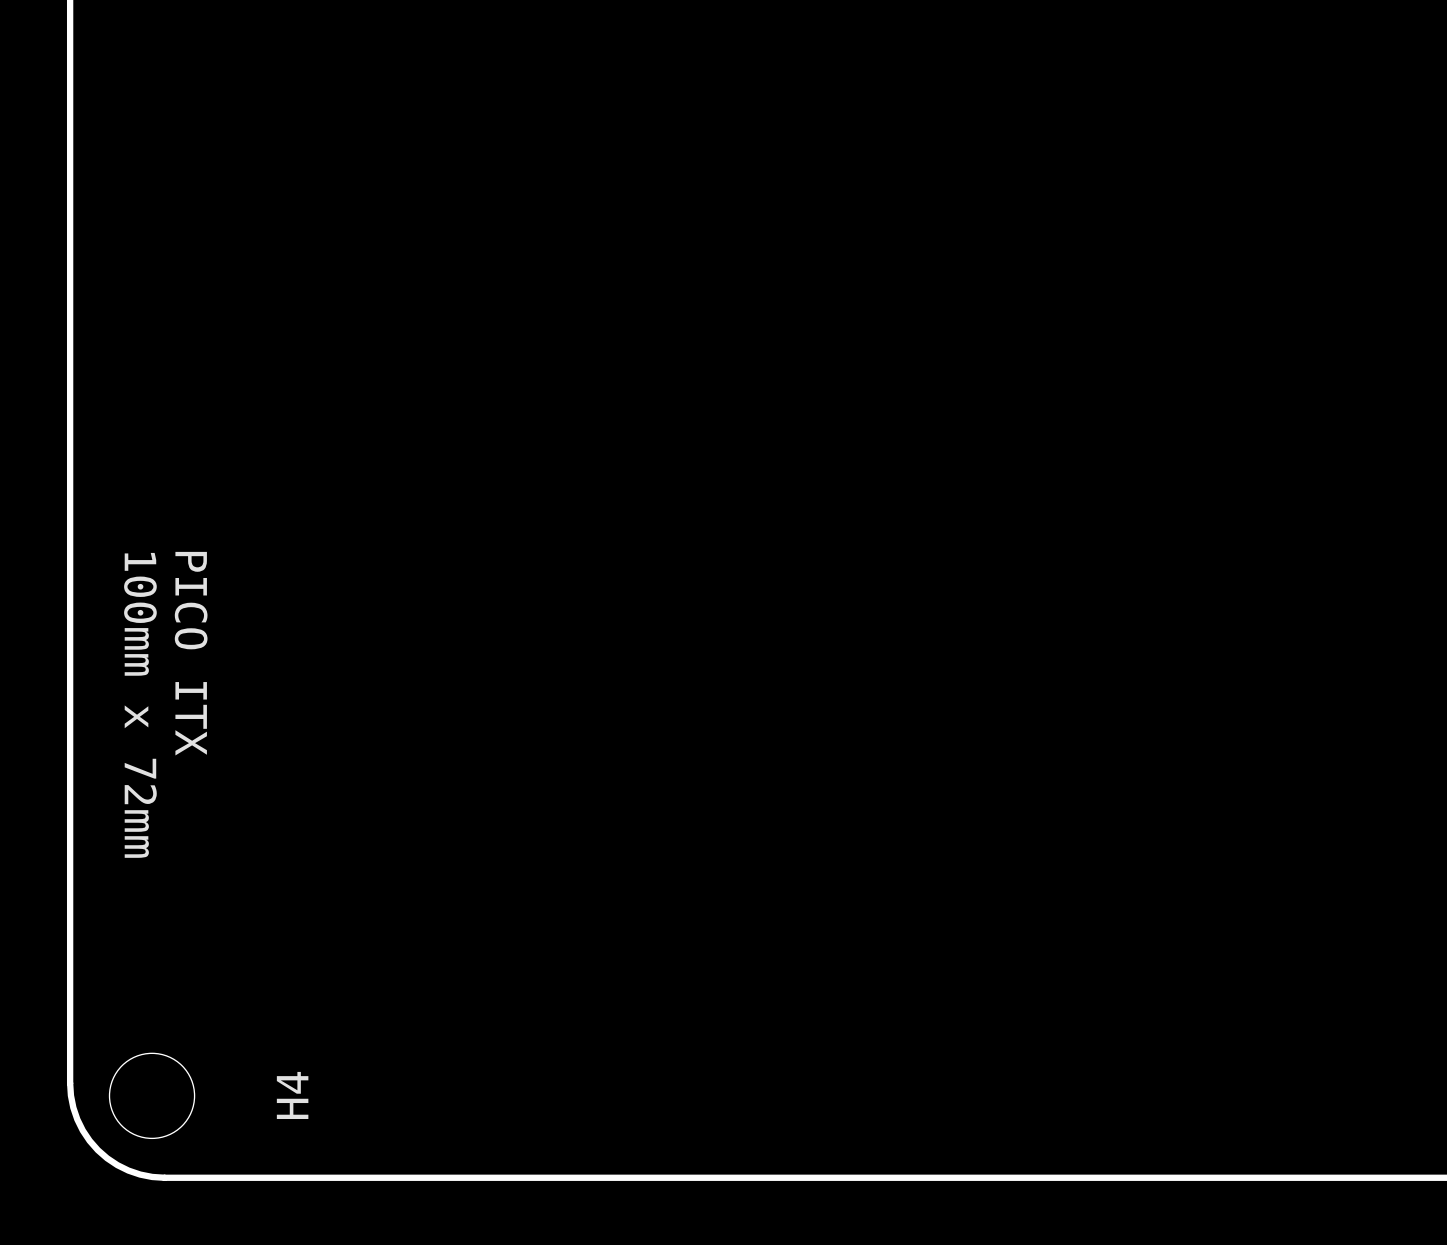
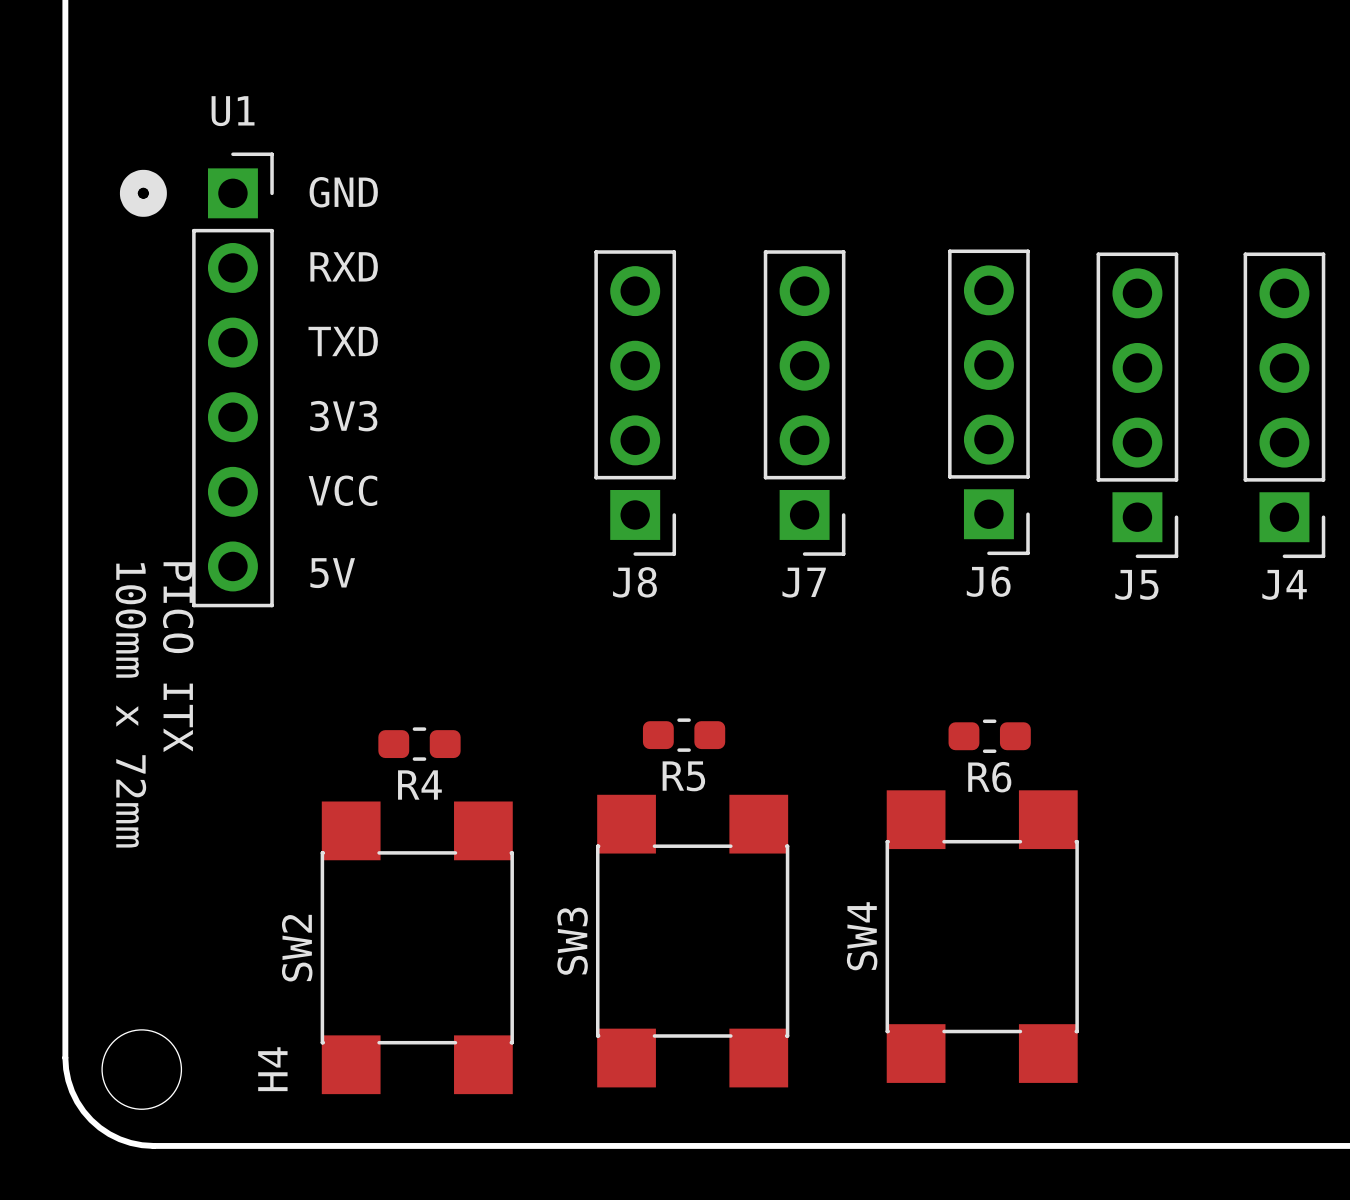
U1: none -> (196, 379)
J6: none -> (988, 402)
J8: none -> (635, 403)
J7: none -> (804, 403)
J5: none -> (1137, 405)
J4: none -> (1284, 405)
R5: none -> (684, 735)
R6: none -> (989, 736)
R4: none -> (419, 744)
SW4: none -> (982, 936)
SW3: none -> (692, 941)
SW2: none -> (417, 947)

